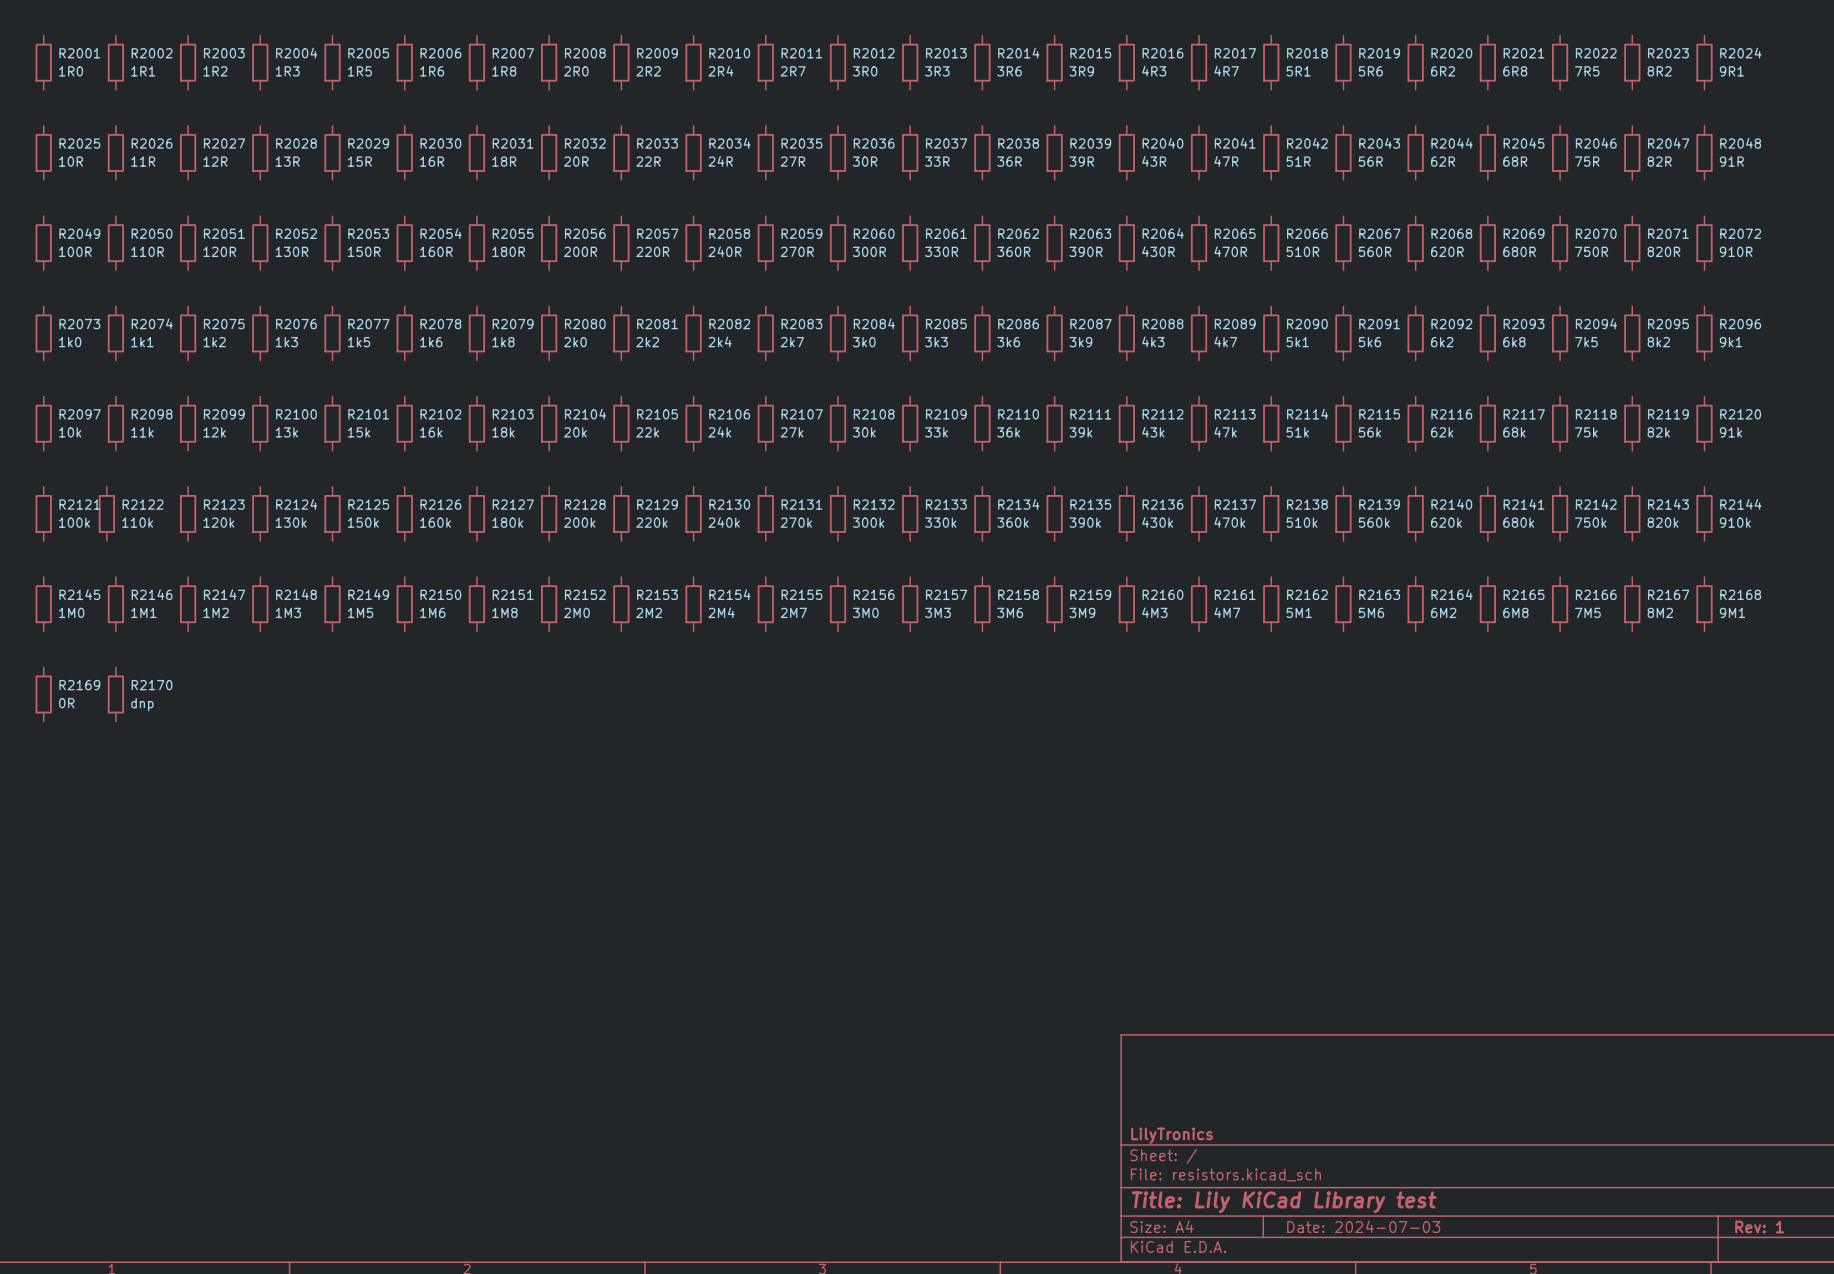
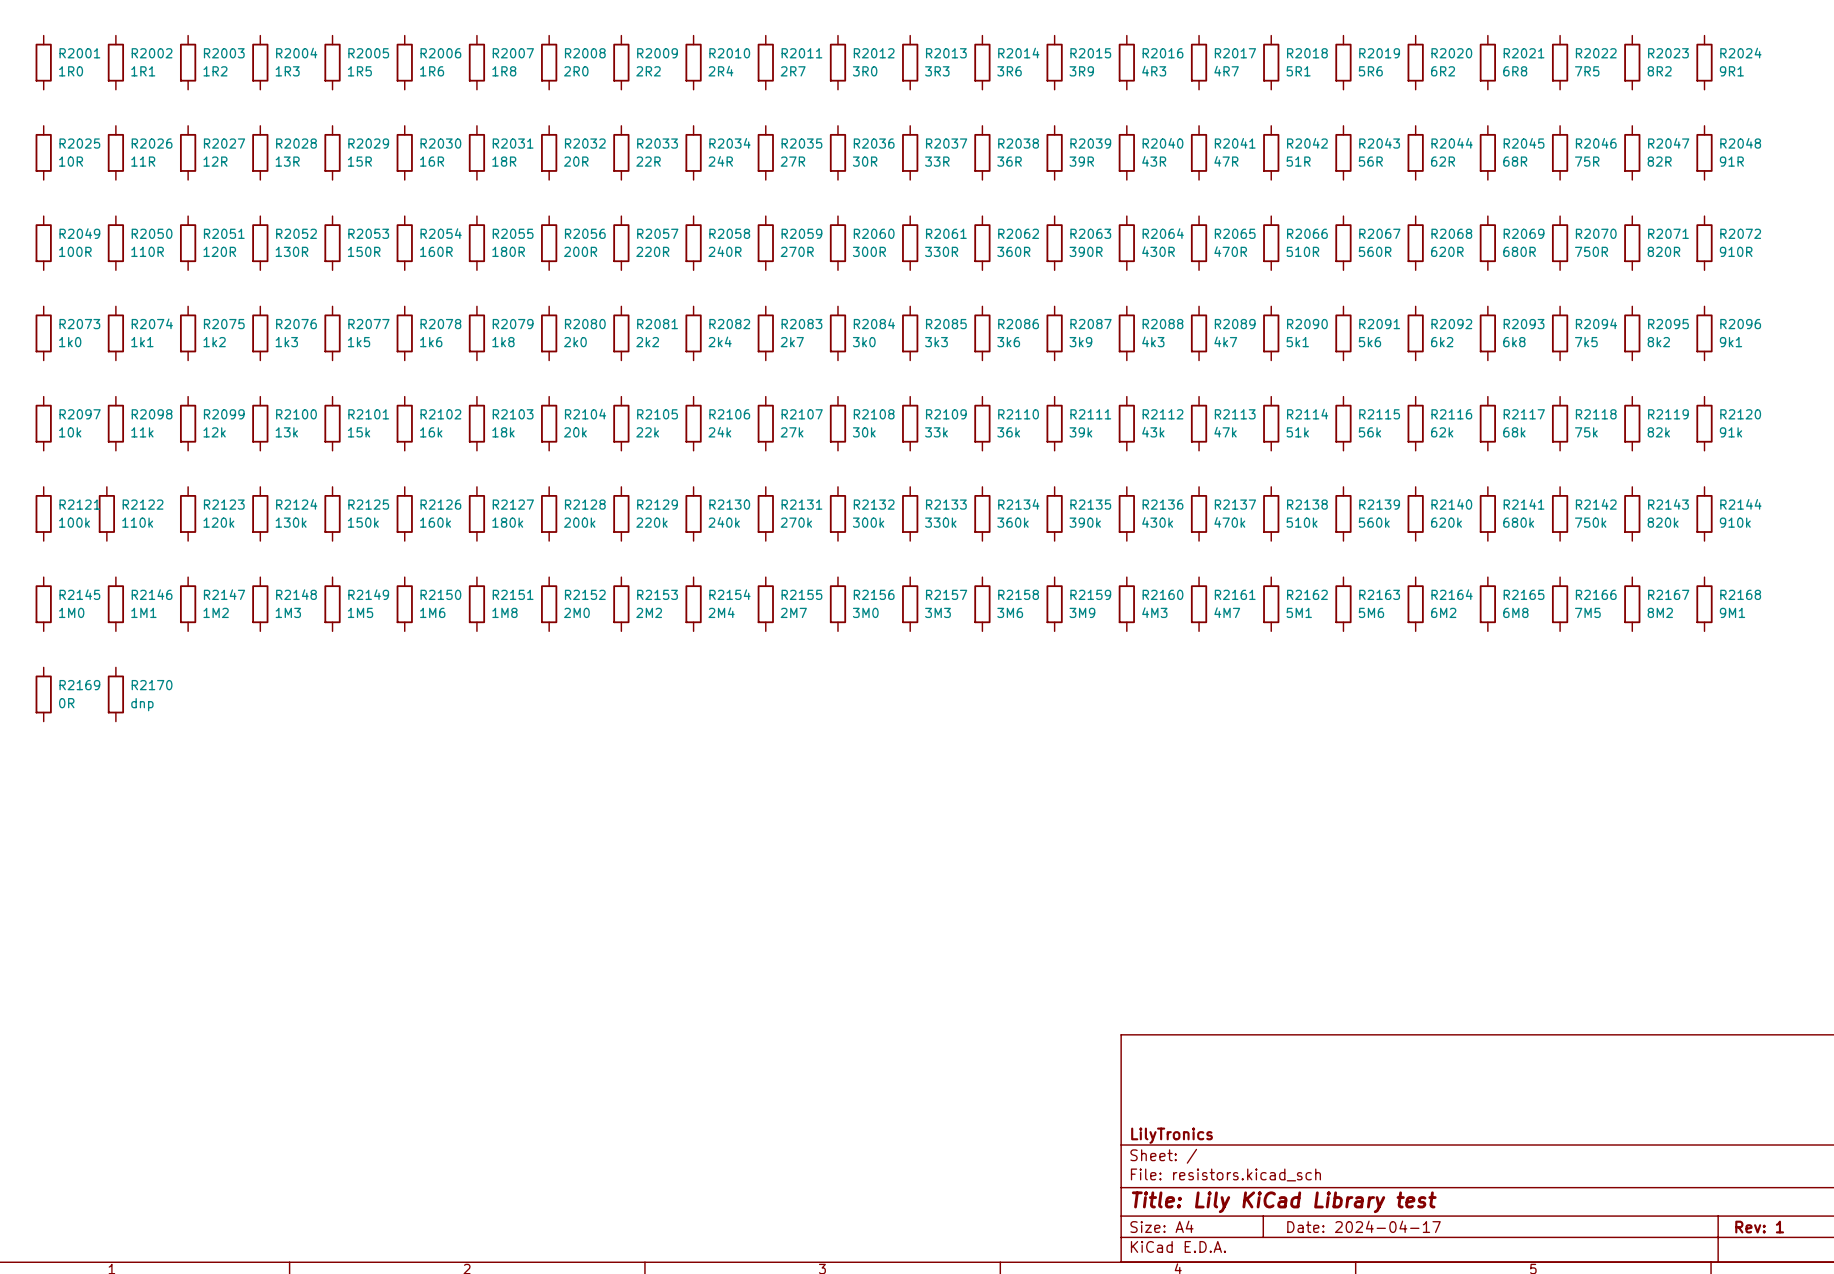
title block: Date: 2024-07-03 (1363, 1226) -> Date: 2024-04-17 (1364, 1226)

